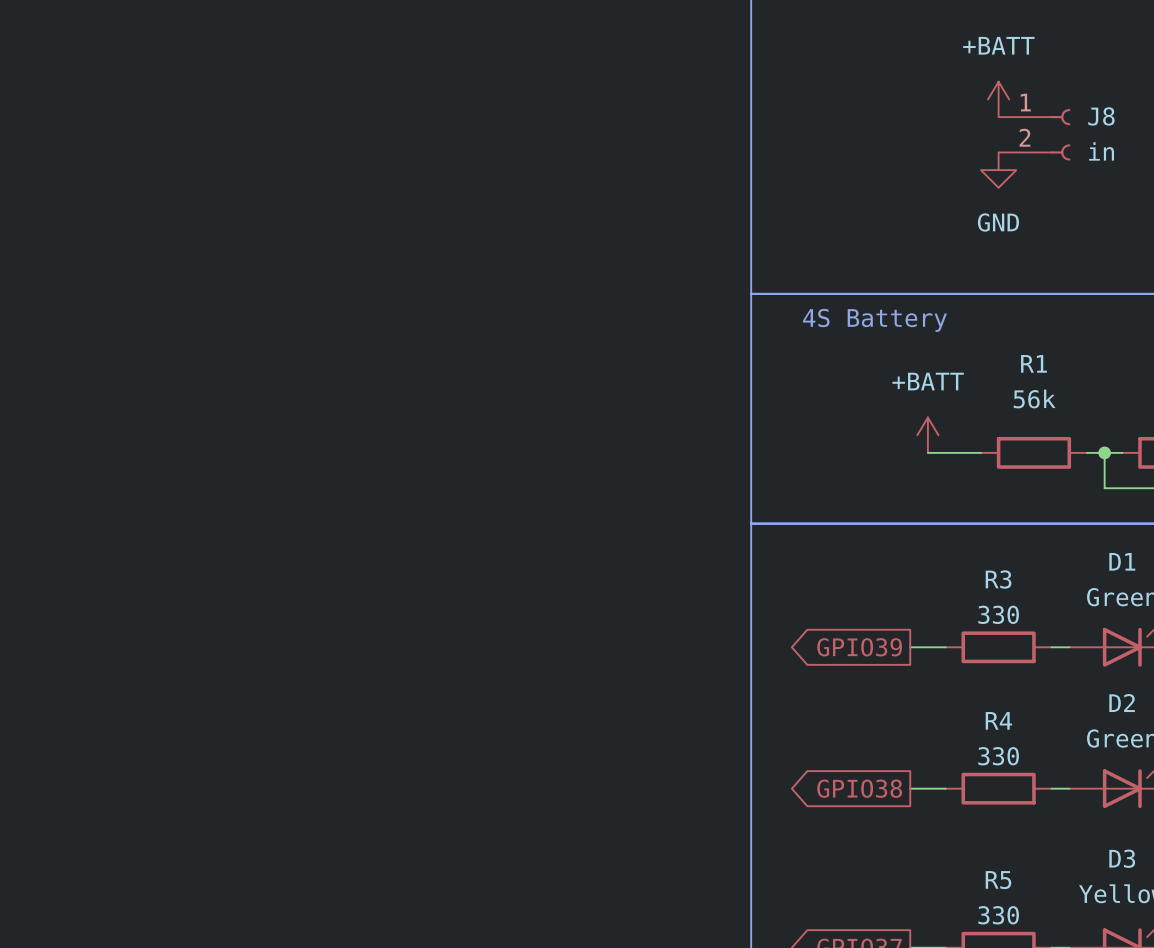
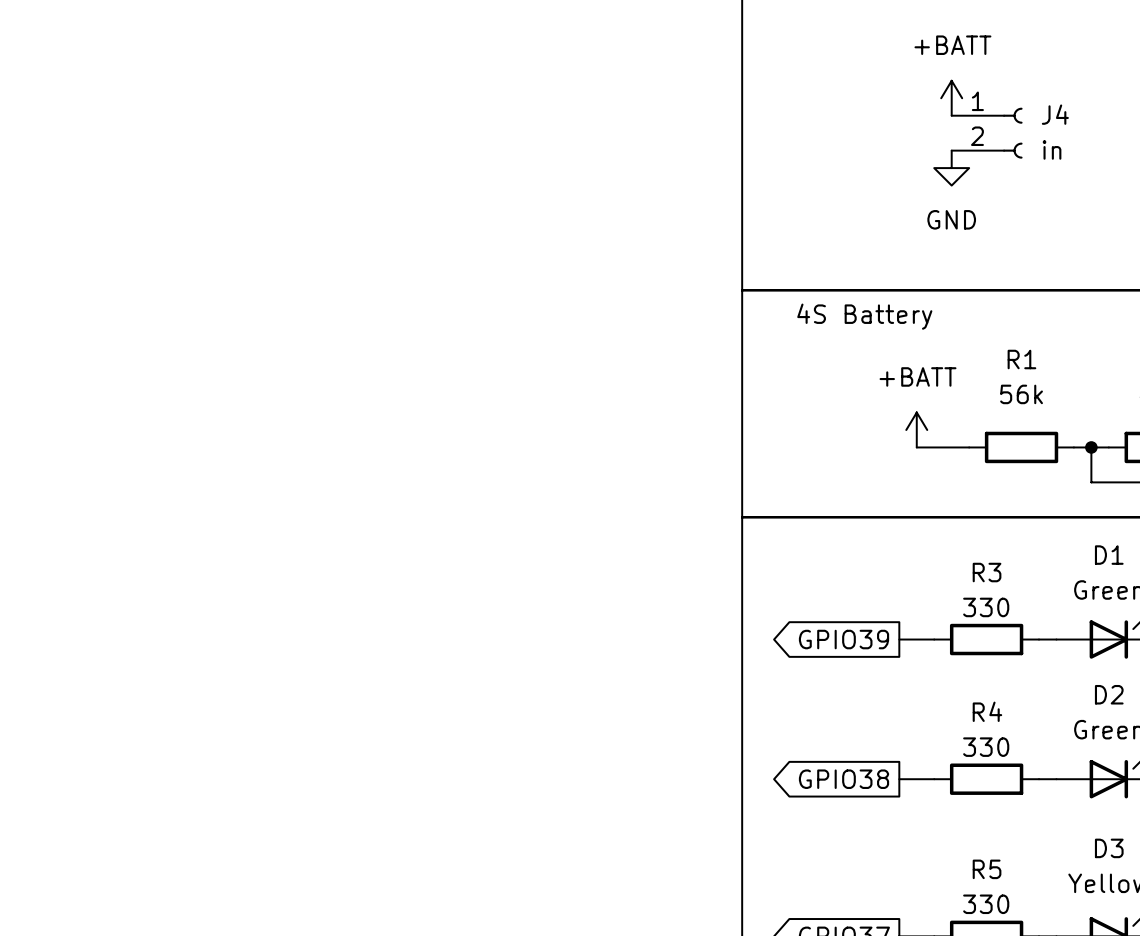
power symbol position: +BATT (998, 99) -> +BATT (951, 98)
J4: none -> in (987, 133)
J8: in (1034, 134) -> none
power symbol position: GND (998, 170) -> GND (951, 168)

